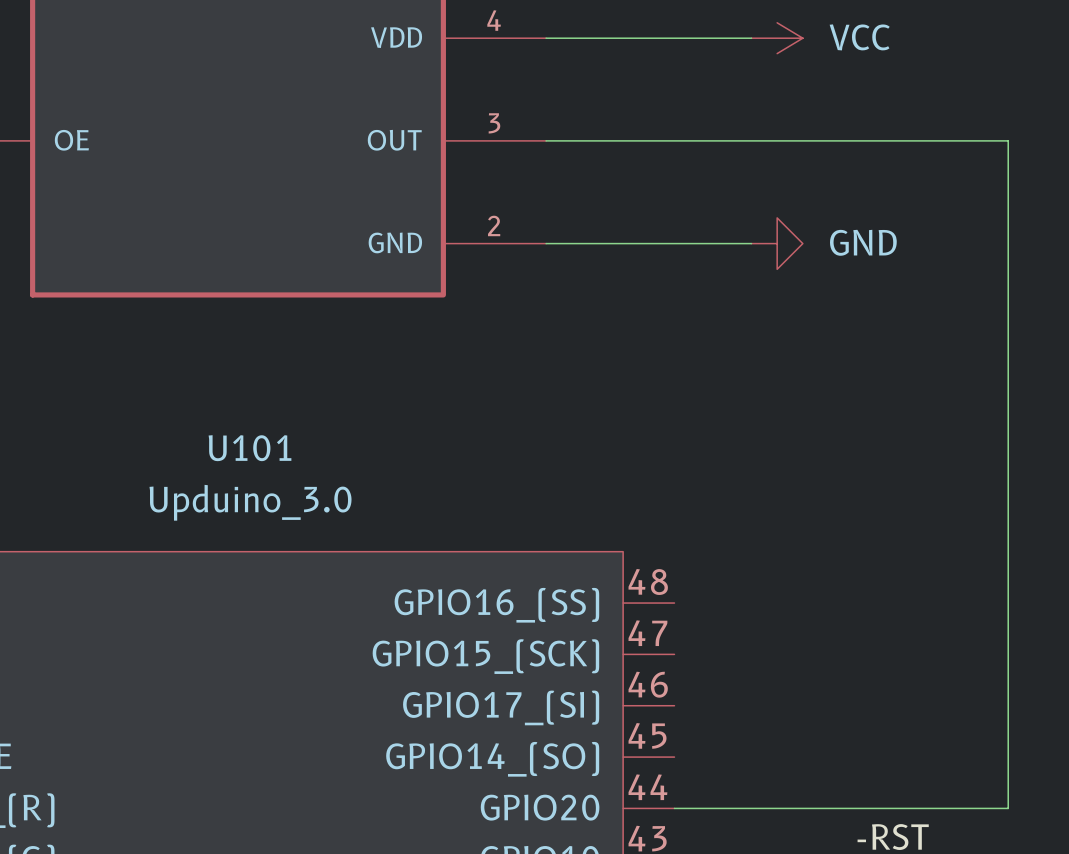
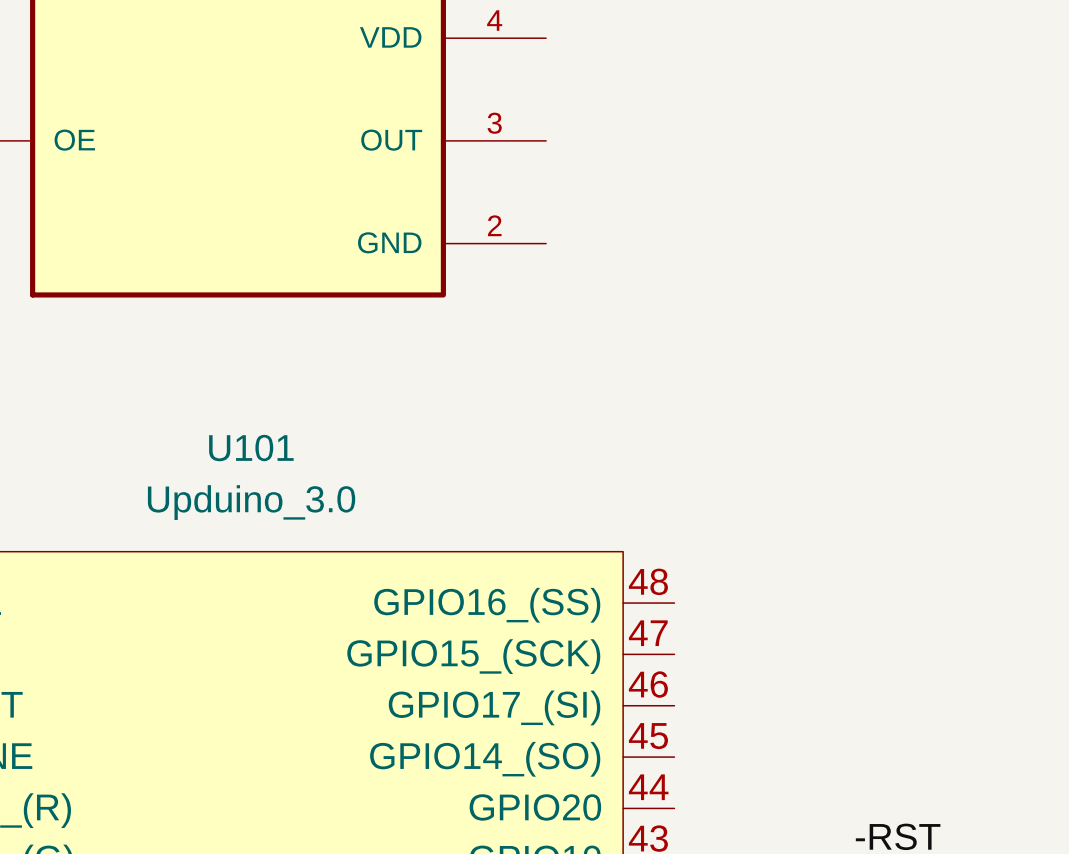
wire: (546, 38) (751, 38) -> none
power symbol: VCC (777, 38) -> none
wire: (546, 140) (1008, 140) (1008, 808) (674, 808) -> none
wire: (546, 243) (751, 243) -> none
power symbol: GND (777, 243) -> none

